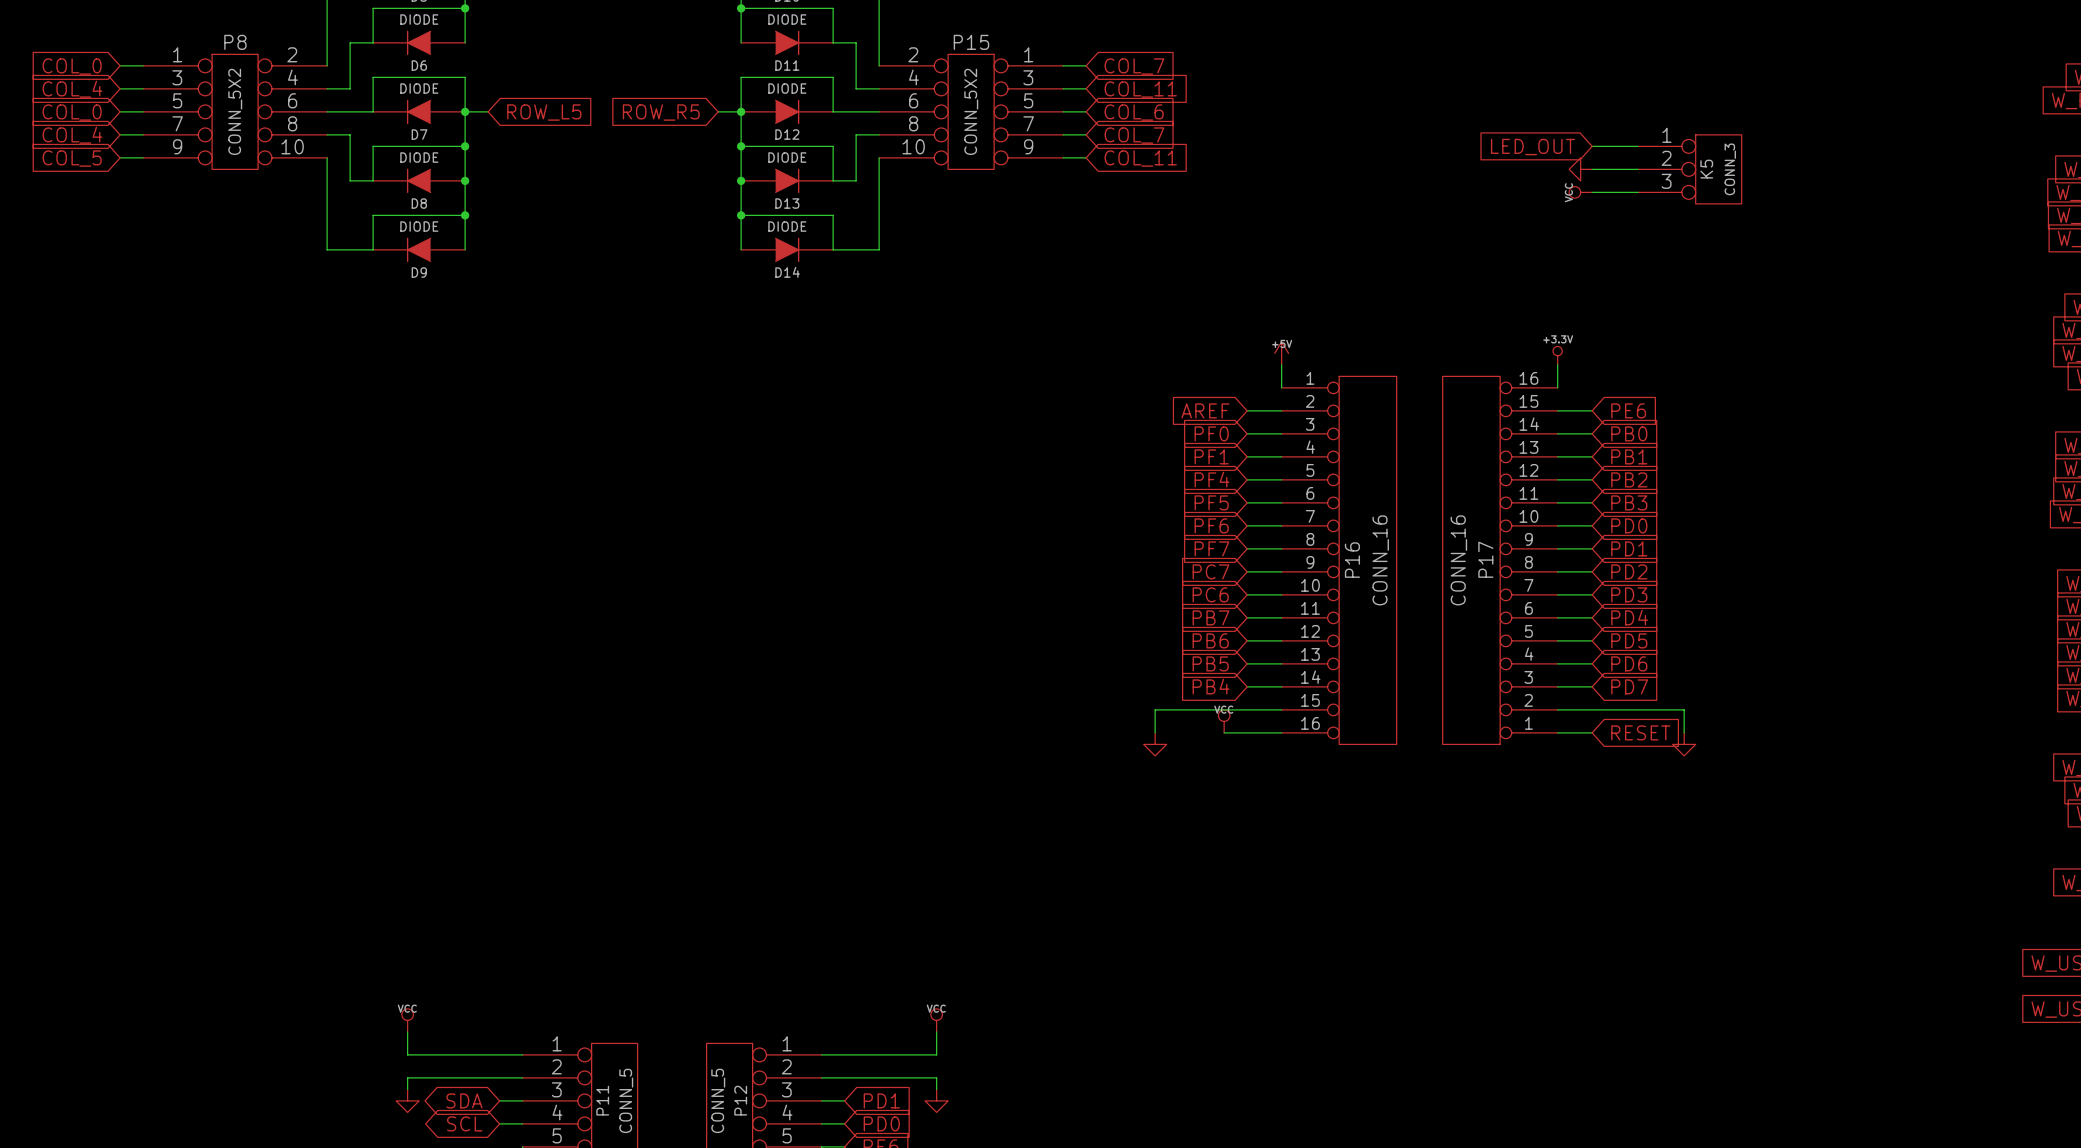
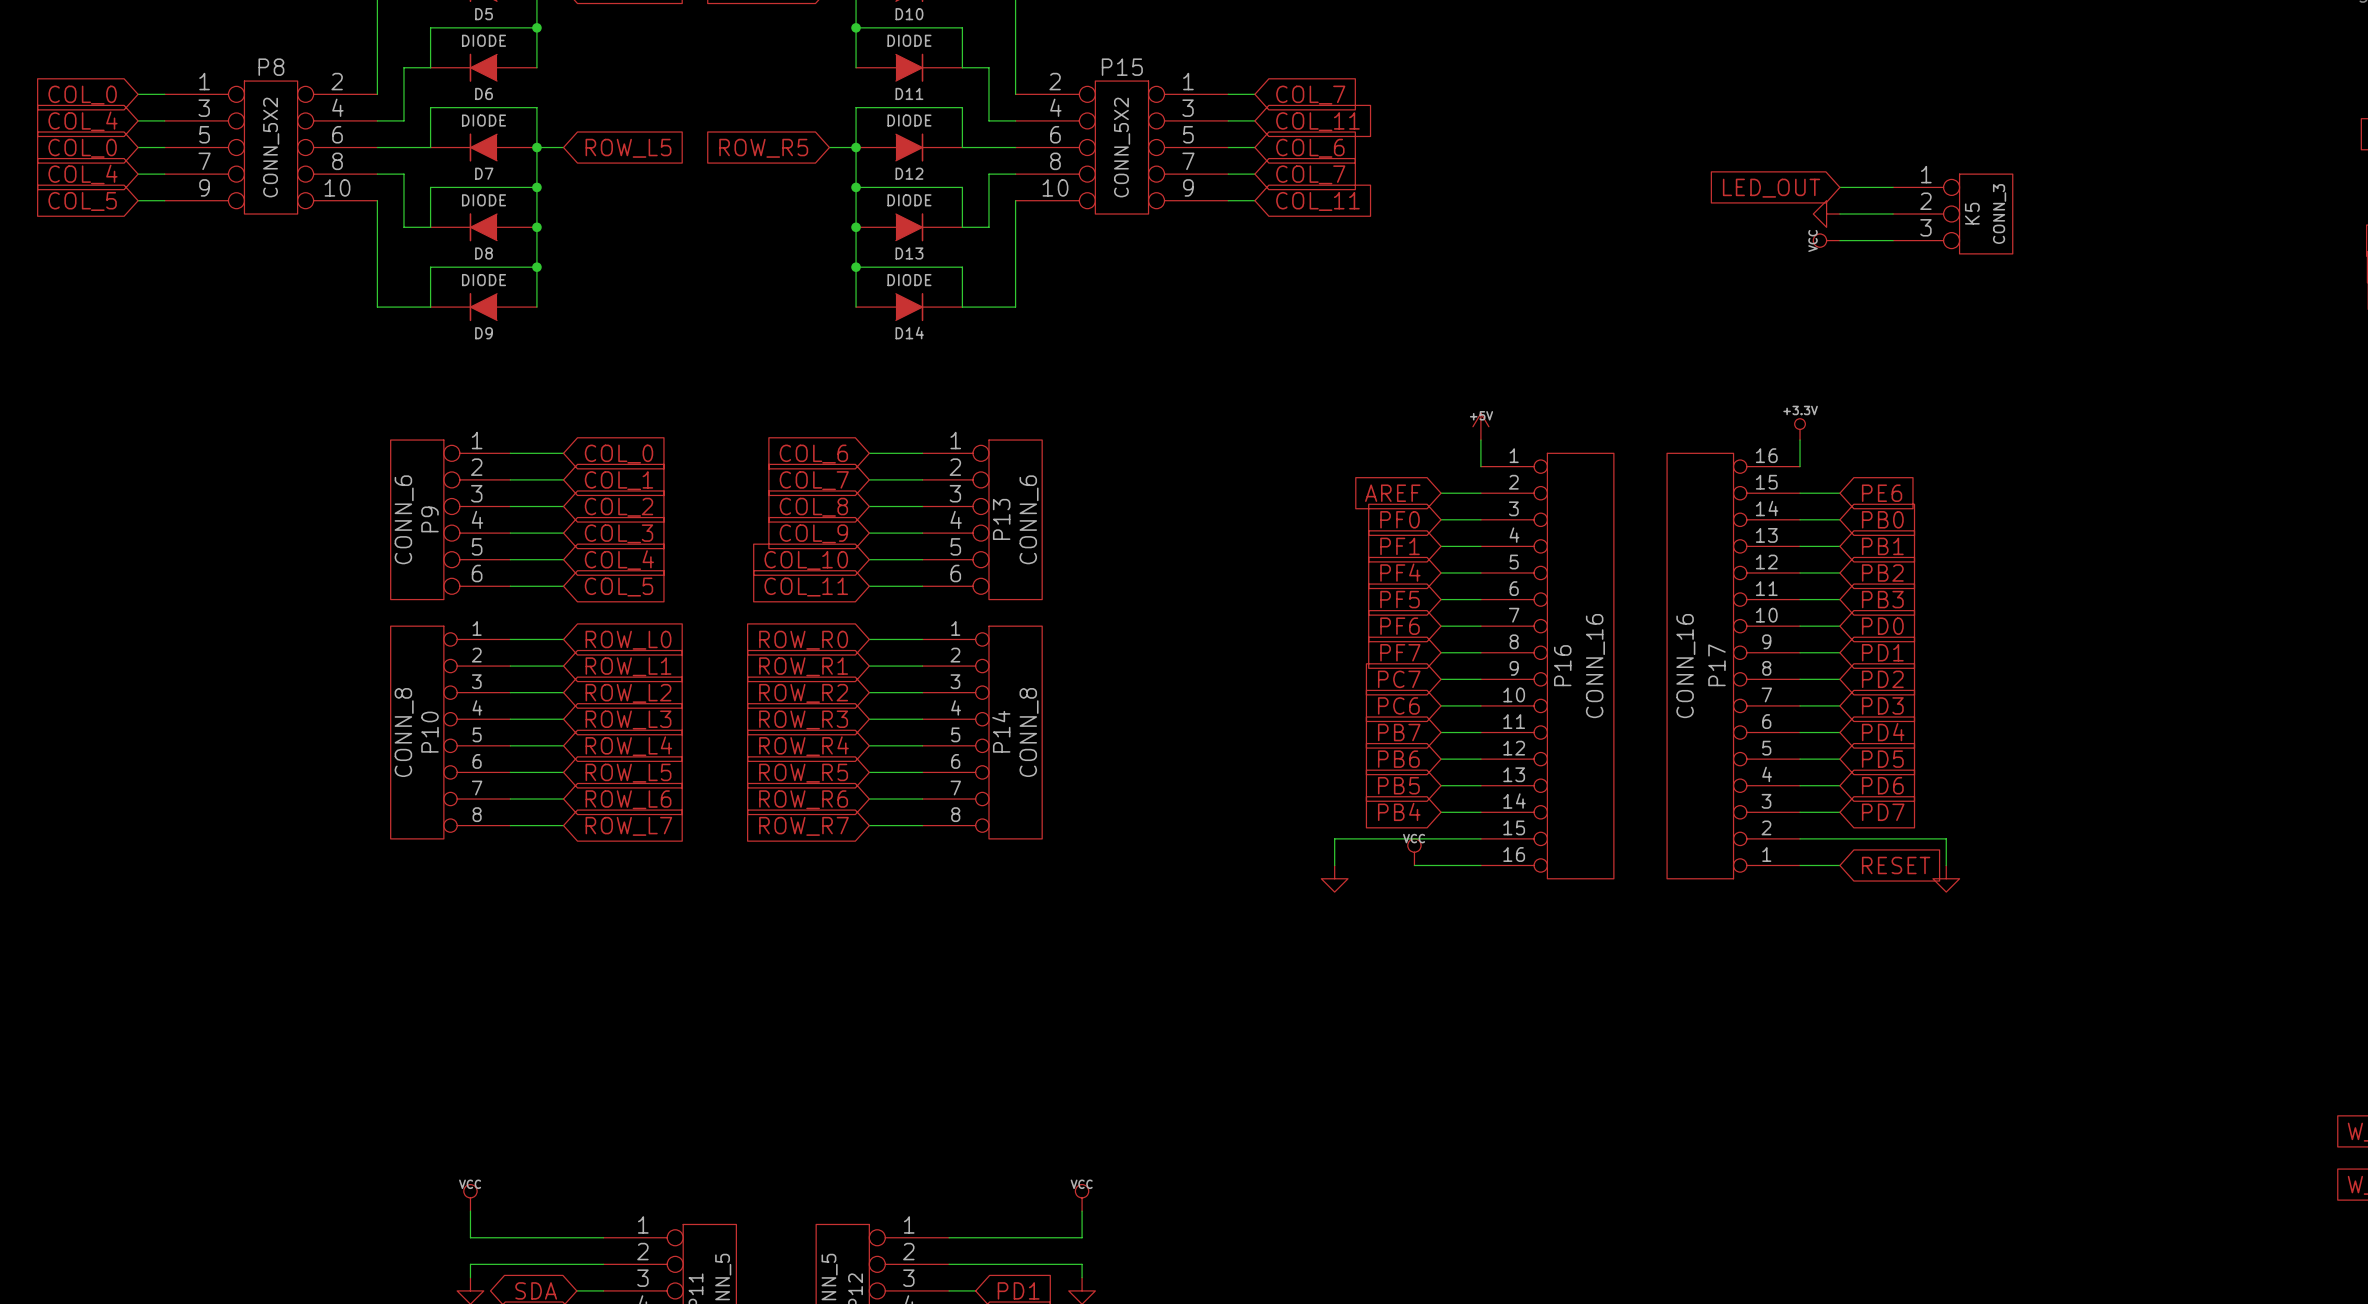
wire: none -> (510, 453) (563, 453)
wire: none -> (869, 453) (922, 453)
global label: none -> COL_0 (619, 454)
global label: none -> COL_6 (813, 454)
wire: none -> (510, 479) (563, 479)
wire: none -> (869, 479) (922, 479)
global label: none -> COL_1 (619, 480)
global label: none -> COL_7 (814, 480)
wire: none -> (510, 506) (563, 506)
wire: none -> (869, 506) (922, 506)
global label: none -> COL_2 (619, 507)
global label: none -> COL_8 (813, 507)
P9: none -> CONN_6 (450, 519)
P13: none -> CONN_6 (982, 519)
wire: none -> (510, 533) (563, 533)
wire: none -> (869, 533) (922, 533)
global label: none -> COL_3 (619, 533)
global label: none -> COL_9 (813, 533)
wire: none -> (510, 559) (563, 559)
global label: none -> COL_4 (619, 560)
wire: none -> (869, 559) (922, 559)
global label: none -> COL_10 (806, 560)
wire: none -> (510, 586) (563, 586)
wire: none -> (869, 586) (922, 586)
global label: none -> COL_5 (619, 587)
global label: none -> COL_11 (806, 587)
wire: none -> (510, 639) (563, 639)
wire: none -> (869, 639) (922, 639)
global label: none -> ROW_L0 (628, 640)
global label: none -> ROW_R0 (803, 640)
wire: none -> (510, 666) (563, 666)
wire: none -> (869, 666) (922, 666)
global label: none -> ROW_L1 (628, 666)
global label: none -> ROW_R1 (803, 666)
wire: none -> (510, 692) (563, 692)
wire: none -> (869, 692) (922, 692)
global label: none -> ROW_L2 (628, 693)
global label: none -> ROW_R2 (803, 693)
wire: none -> (510, 719) (563, 719)
wire: none -> (869, 719) (922, 719)
global label: none -> ROW_L3 (628, 719)
global label: none -> ROW_R3 (803, 719)
P10: none -> CONN_8 (450, 732)
P14: none -> CONN_8 (982, 732)
wire: none -> (510, 745) (563, 745)
global label: none -> ROW_L4 (628, 746)
global label: none -> ROW_R4 (803, 746)
wire: none -> (869, 745) (922, 745)
wire: none -> (510, 772) (563, 772)
wire: none -> (869, 772) (922, 772)
global label: none -> ROW_L5 (628, 773)
global label: none -> ROW_R5 (803, 773)
wire: none -> (510, 799) (563, 799)
wire: none -> (869, 799) (922, 799)
global label: none -> ROW_L6 (628, 799)
global label: none -> ROW_R6 (803, 799)
wire: none -> (510, 825) (563, 825)
wire: none -> (869, 825) (922, 825)
global label: none -> ROW_L7 (628, 826)
global label: none -> ROW_R7 (803, 826)

